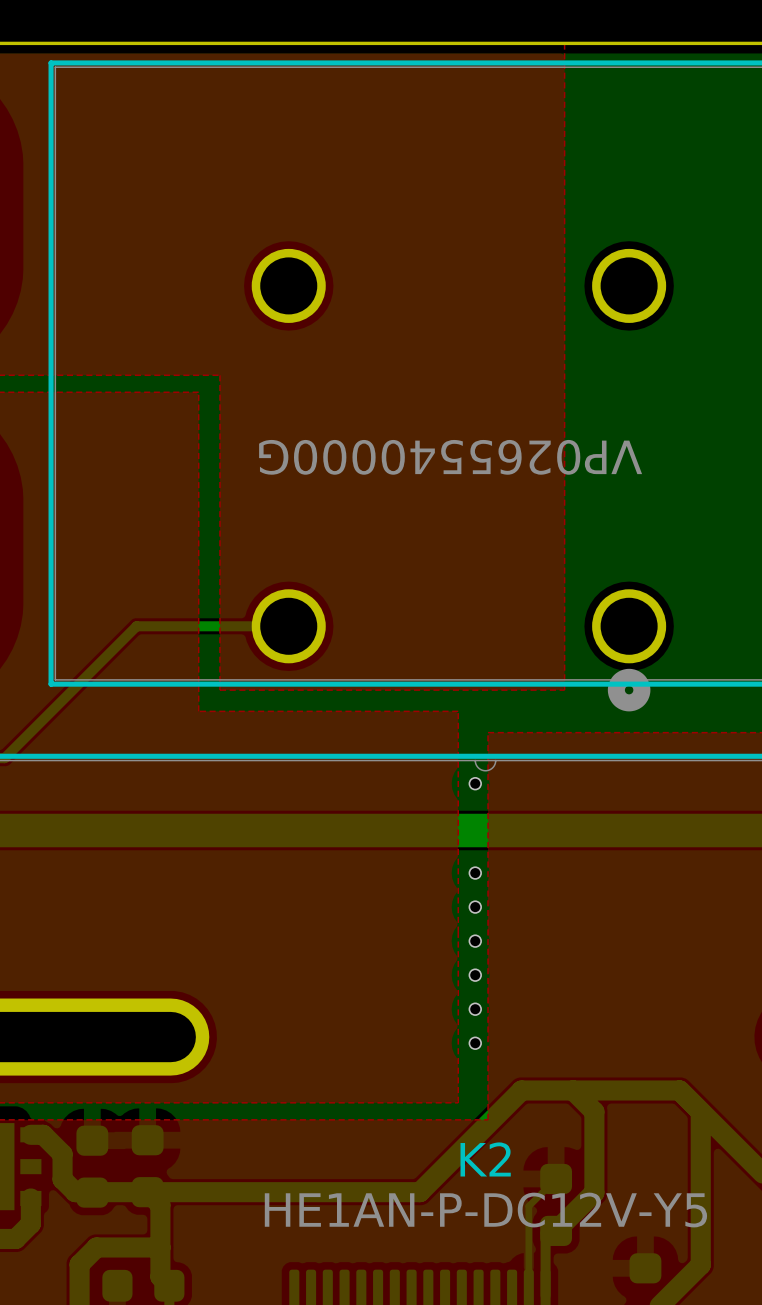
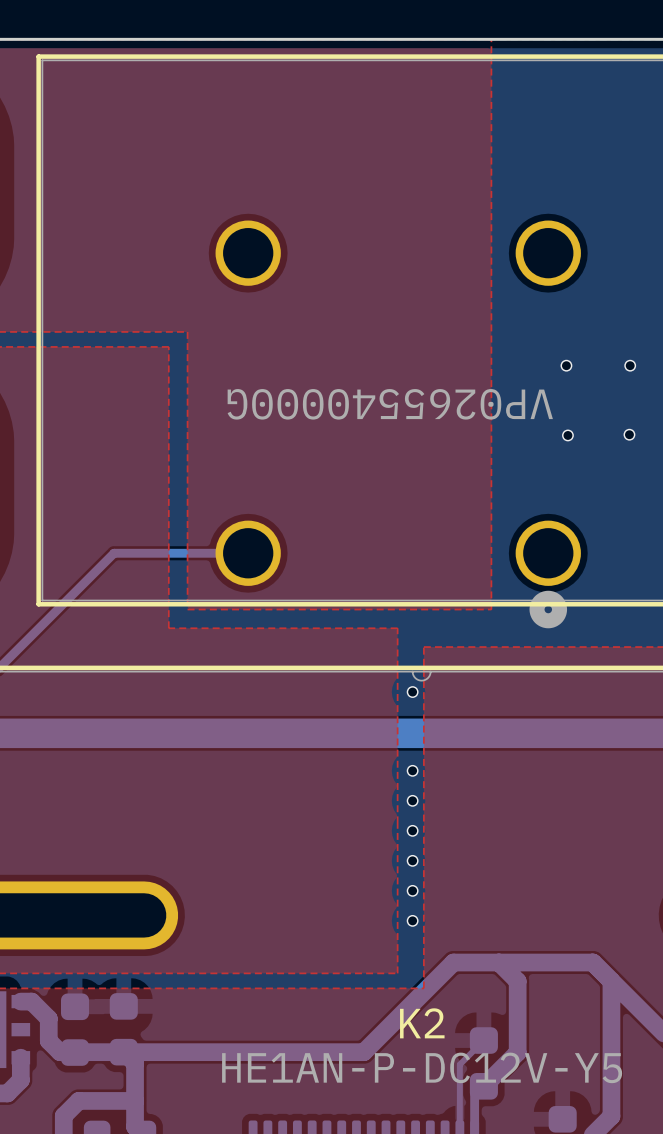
via: none -> (566, 365)
via: none -> (630, 365)
via: none -> (629, 434)
via: none -> (567, 435)

